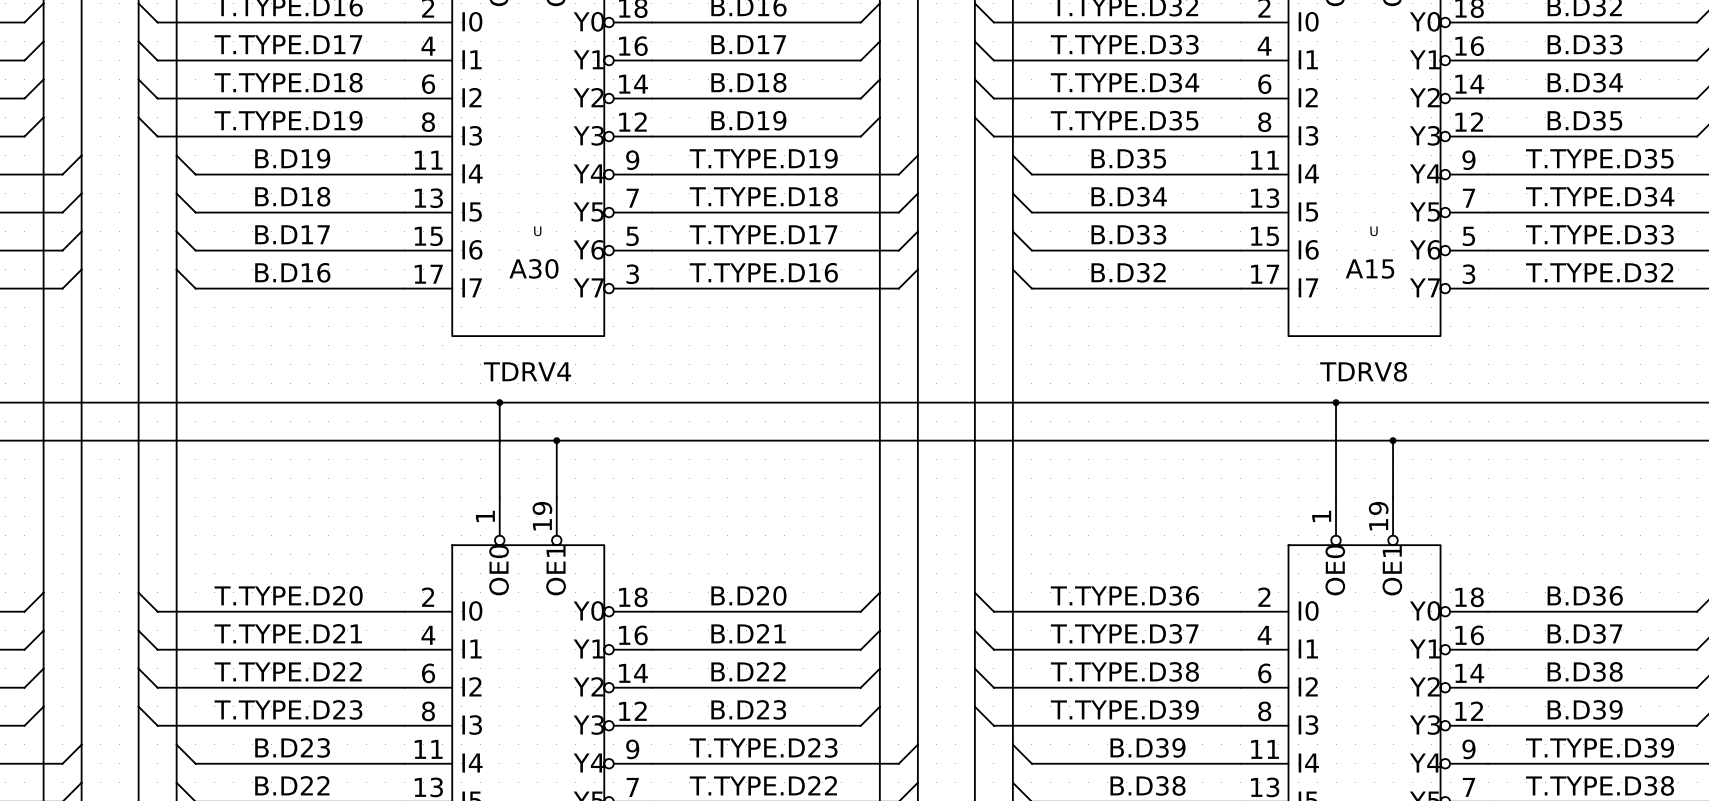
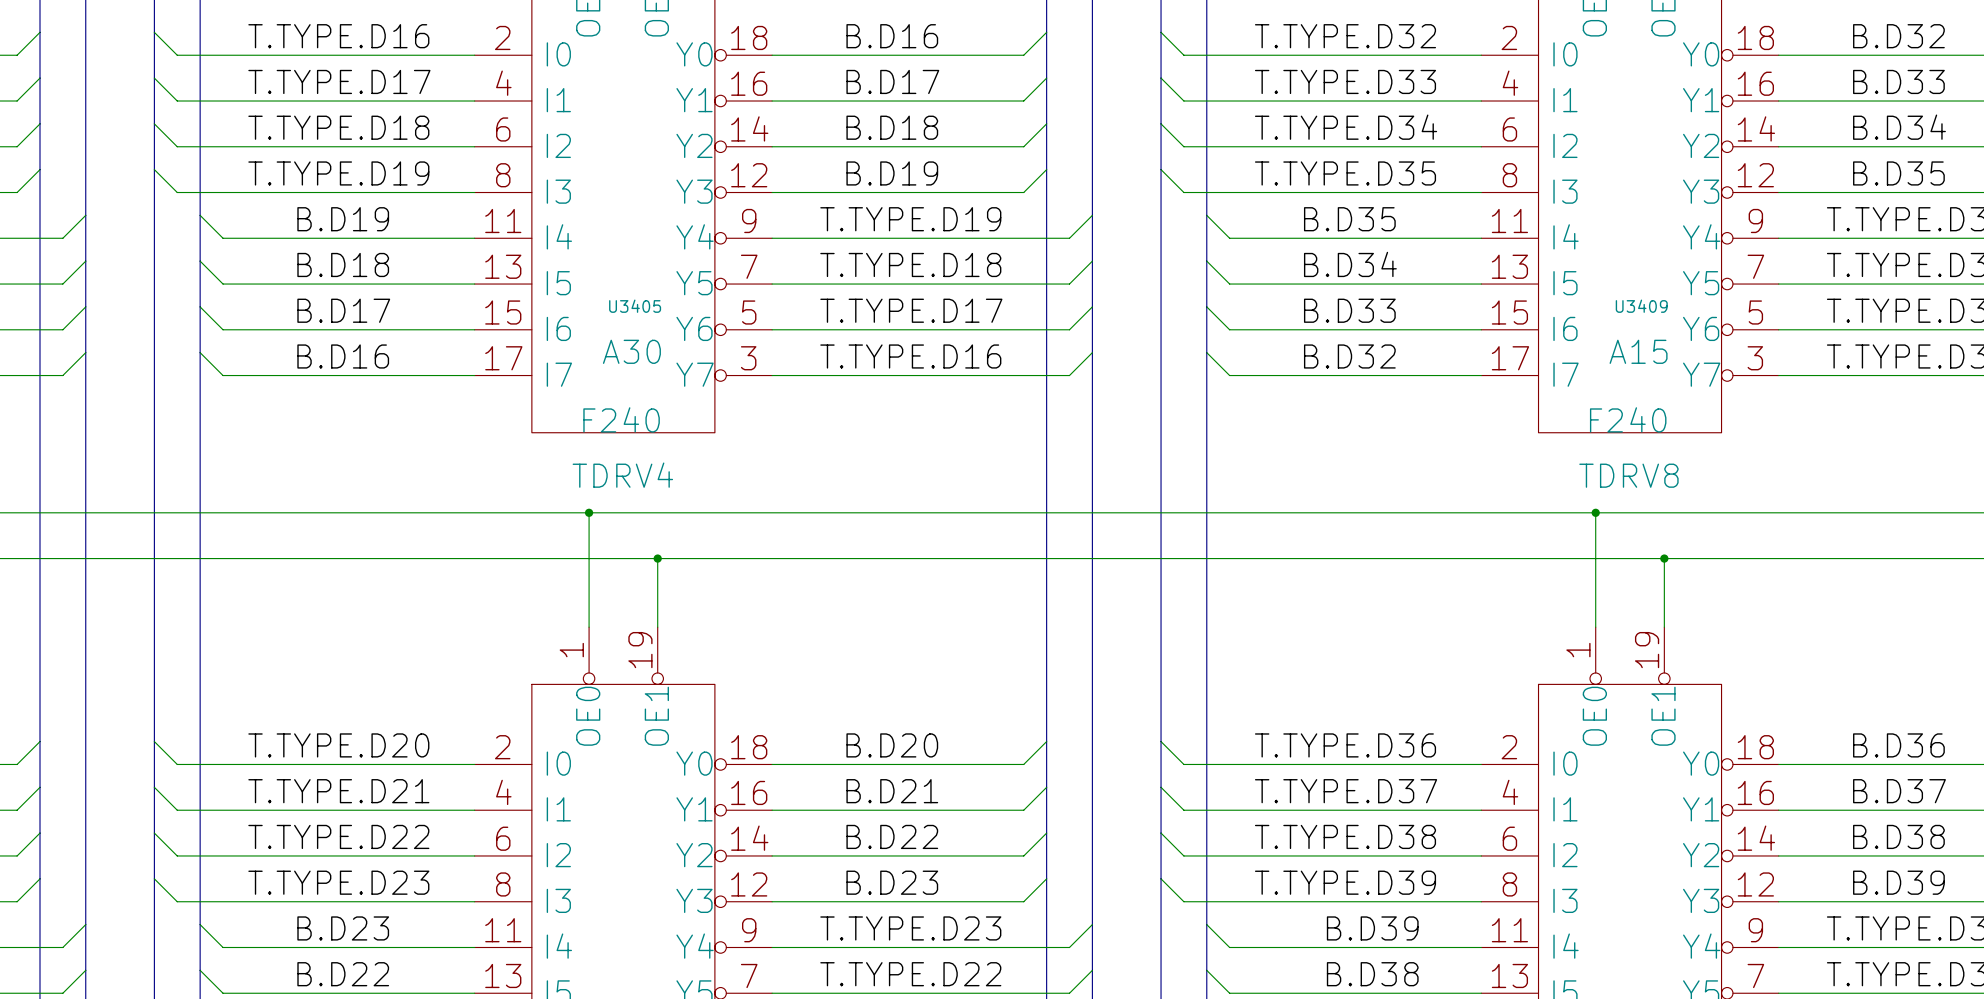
U name: U (537, 231) -> U3405 (635, 306)
U name: U (1374, 231) -> U3409 (1641, 306)
U value: none -> F240 (621, 419)
U value: none -> F240 (1628, 419)

